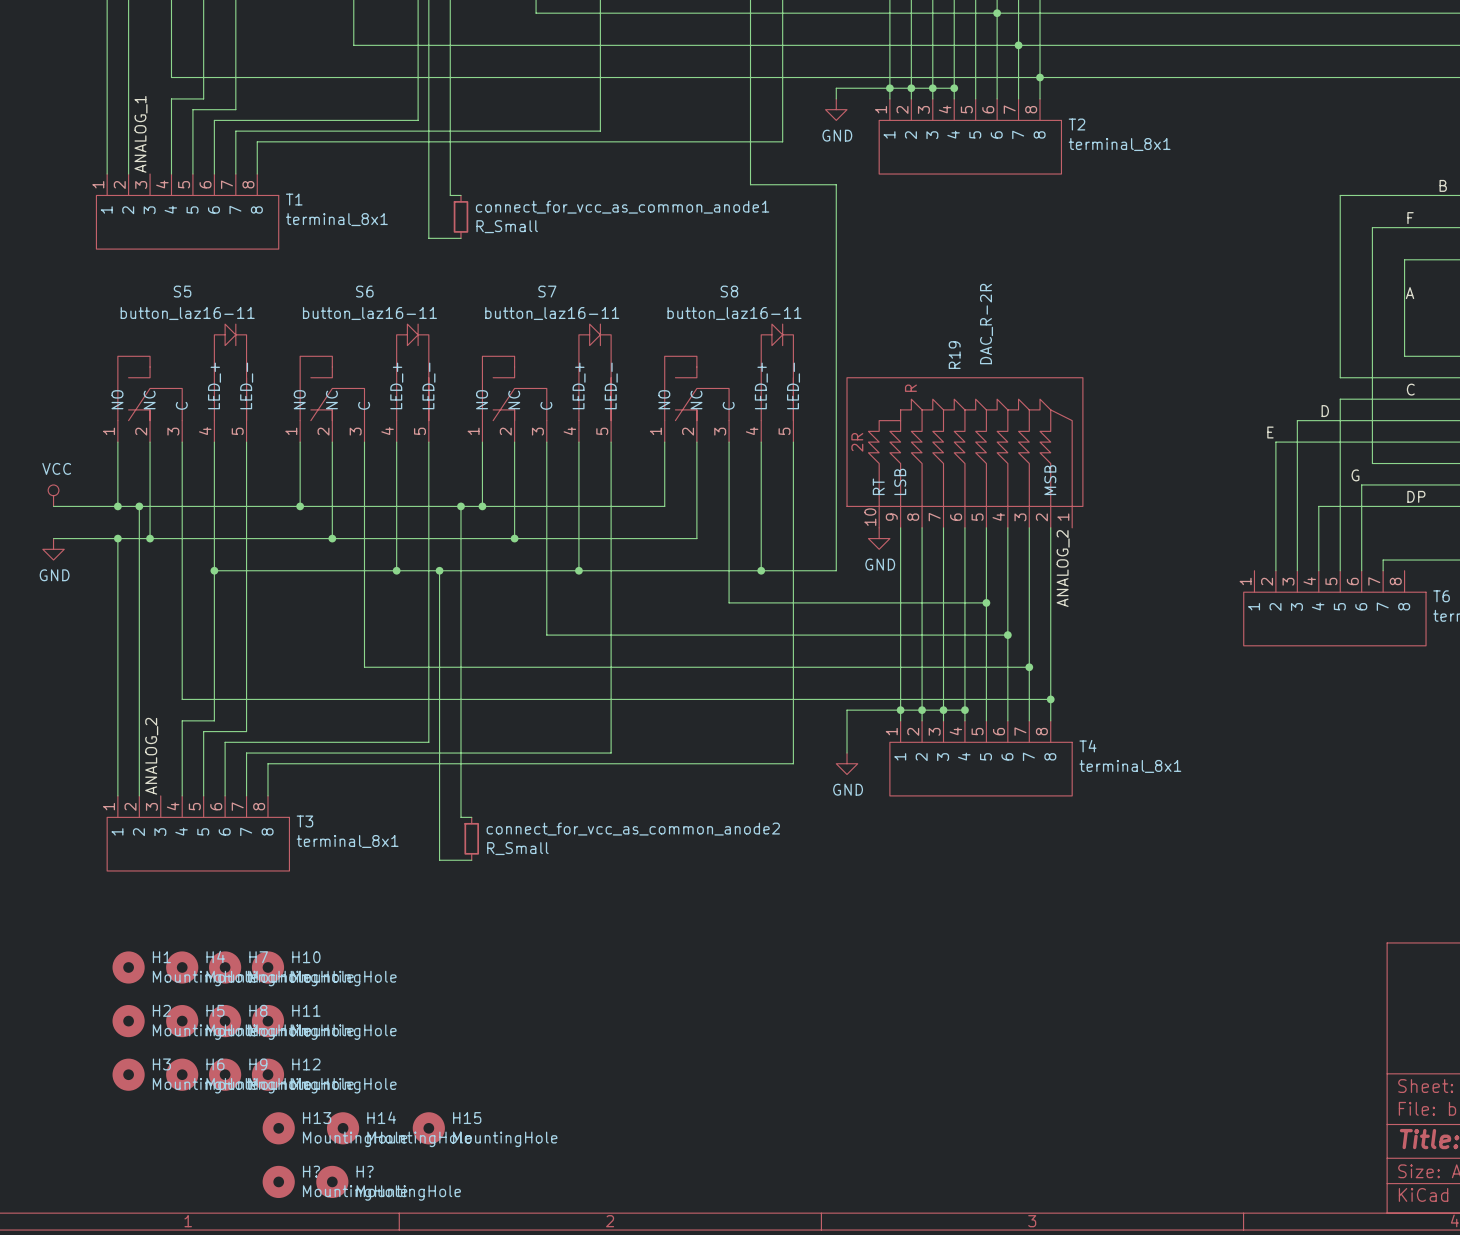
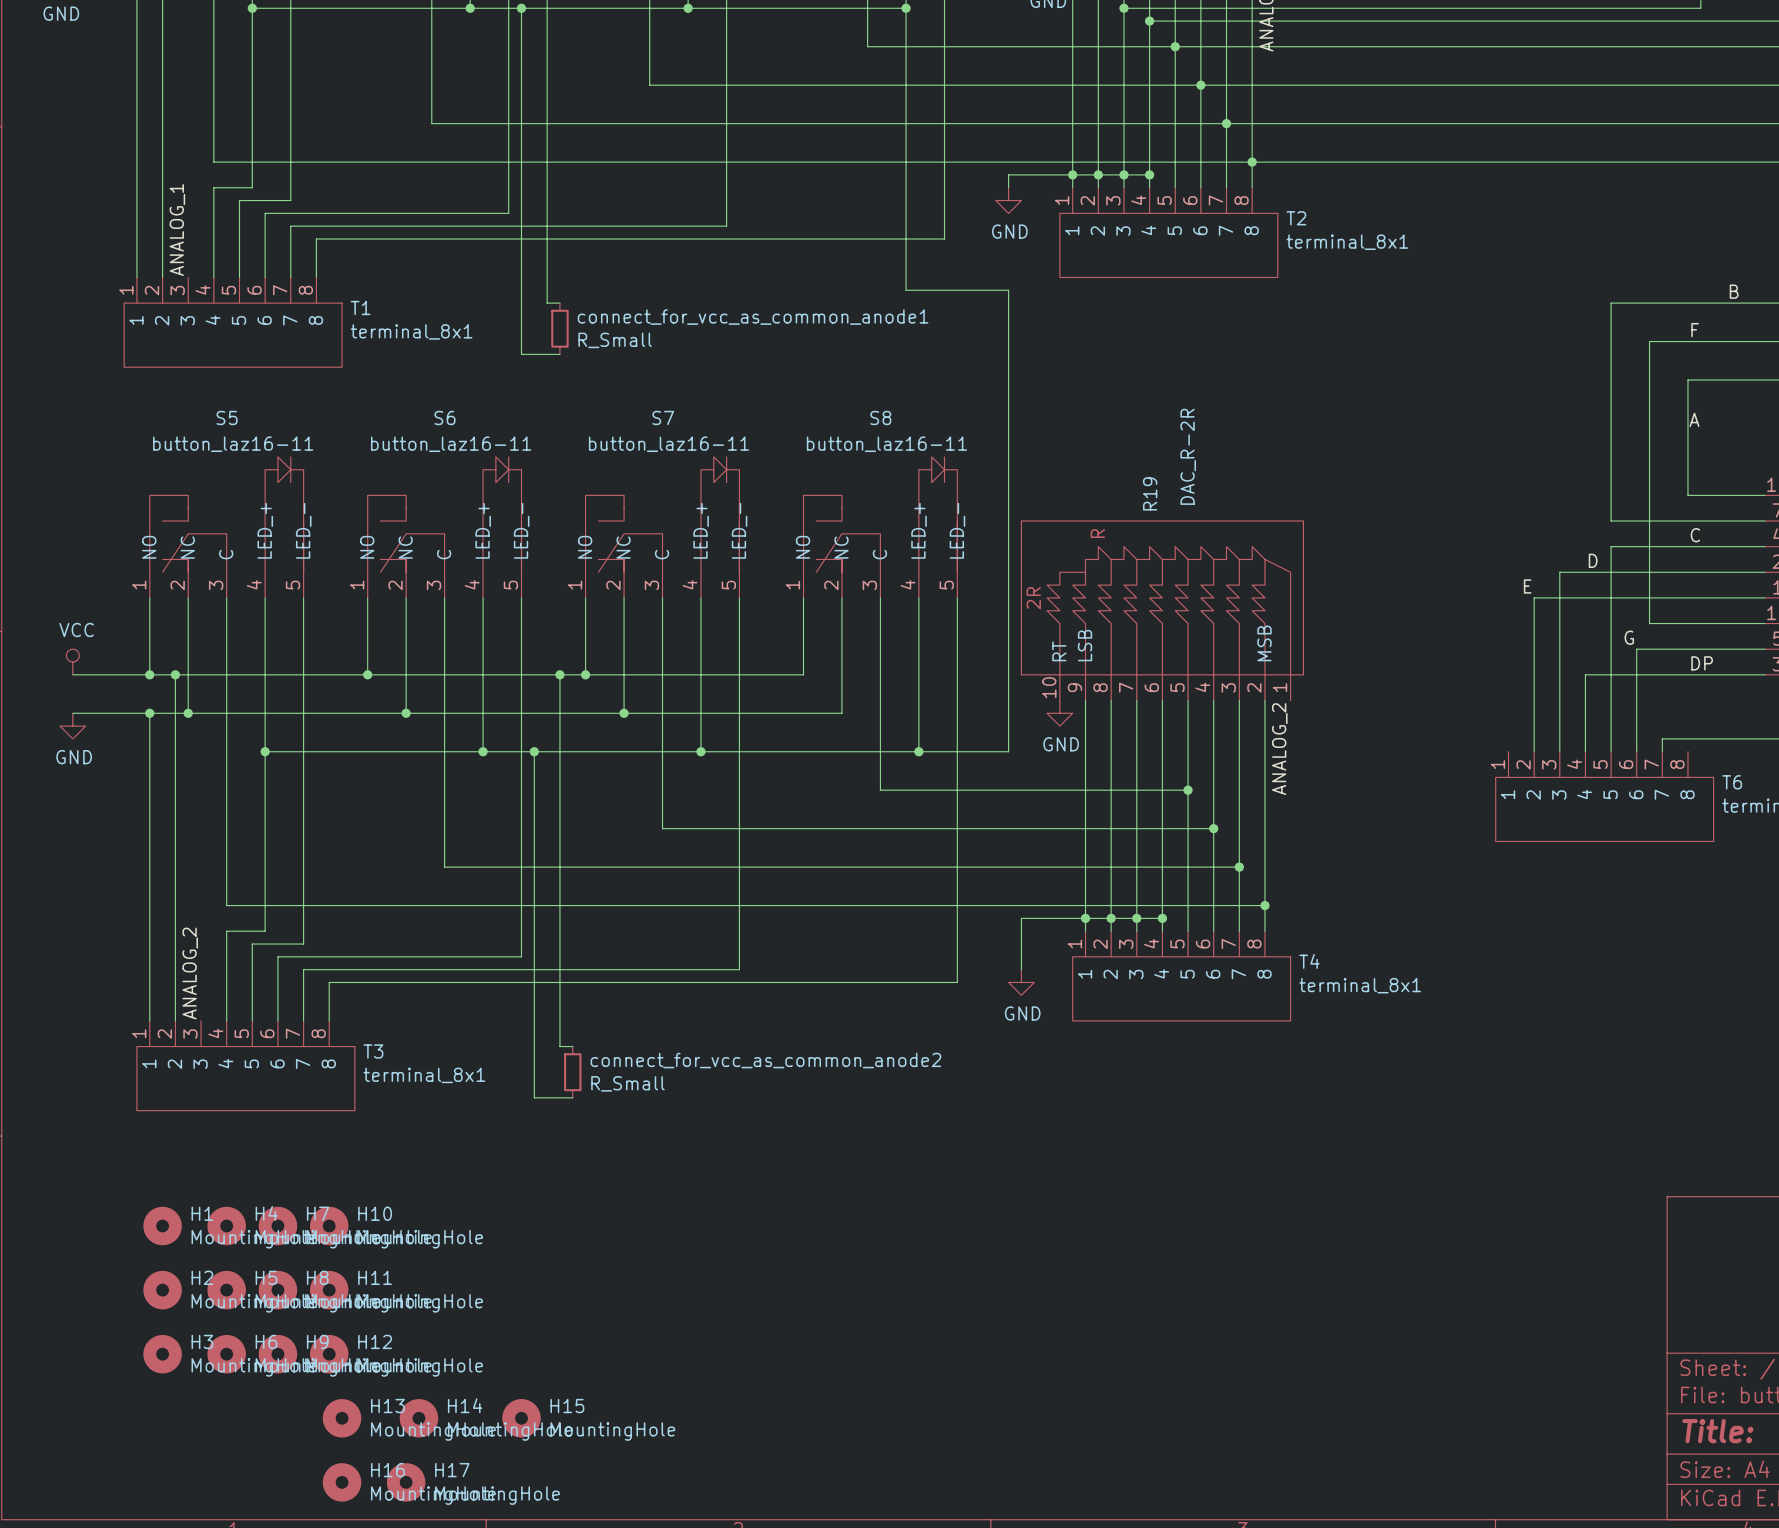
H? name: H? (311, 1171) -> H16 (387, 1470)
H? name: H? (365, 1171) -> H17 (452, 1470)

